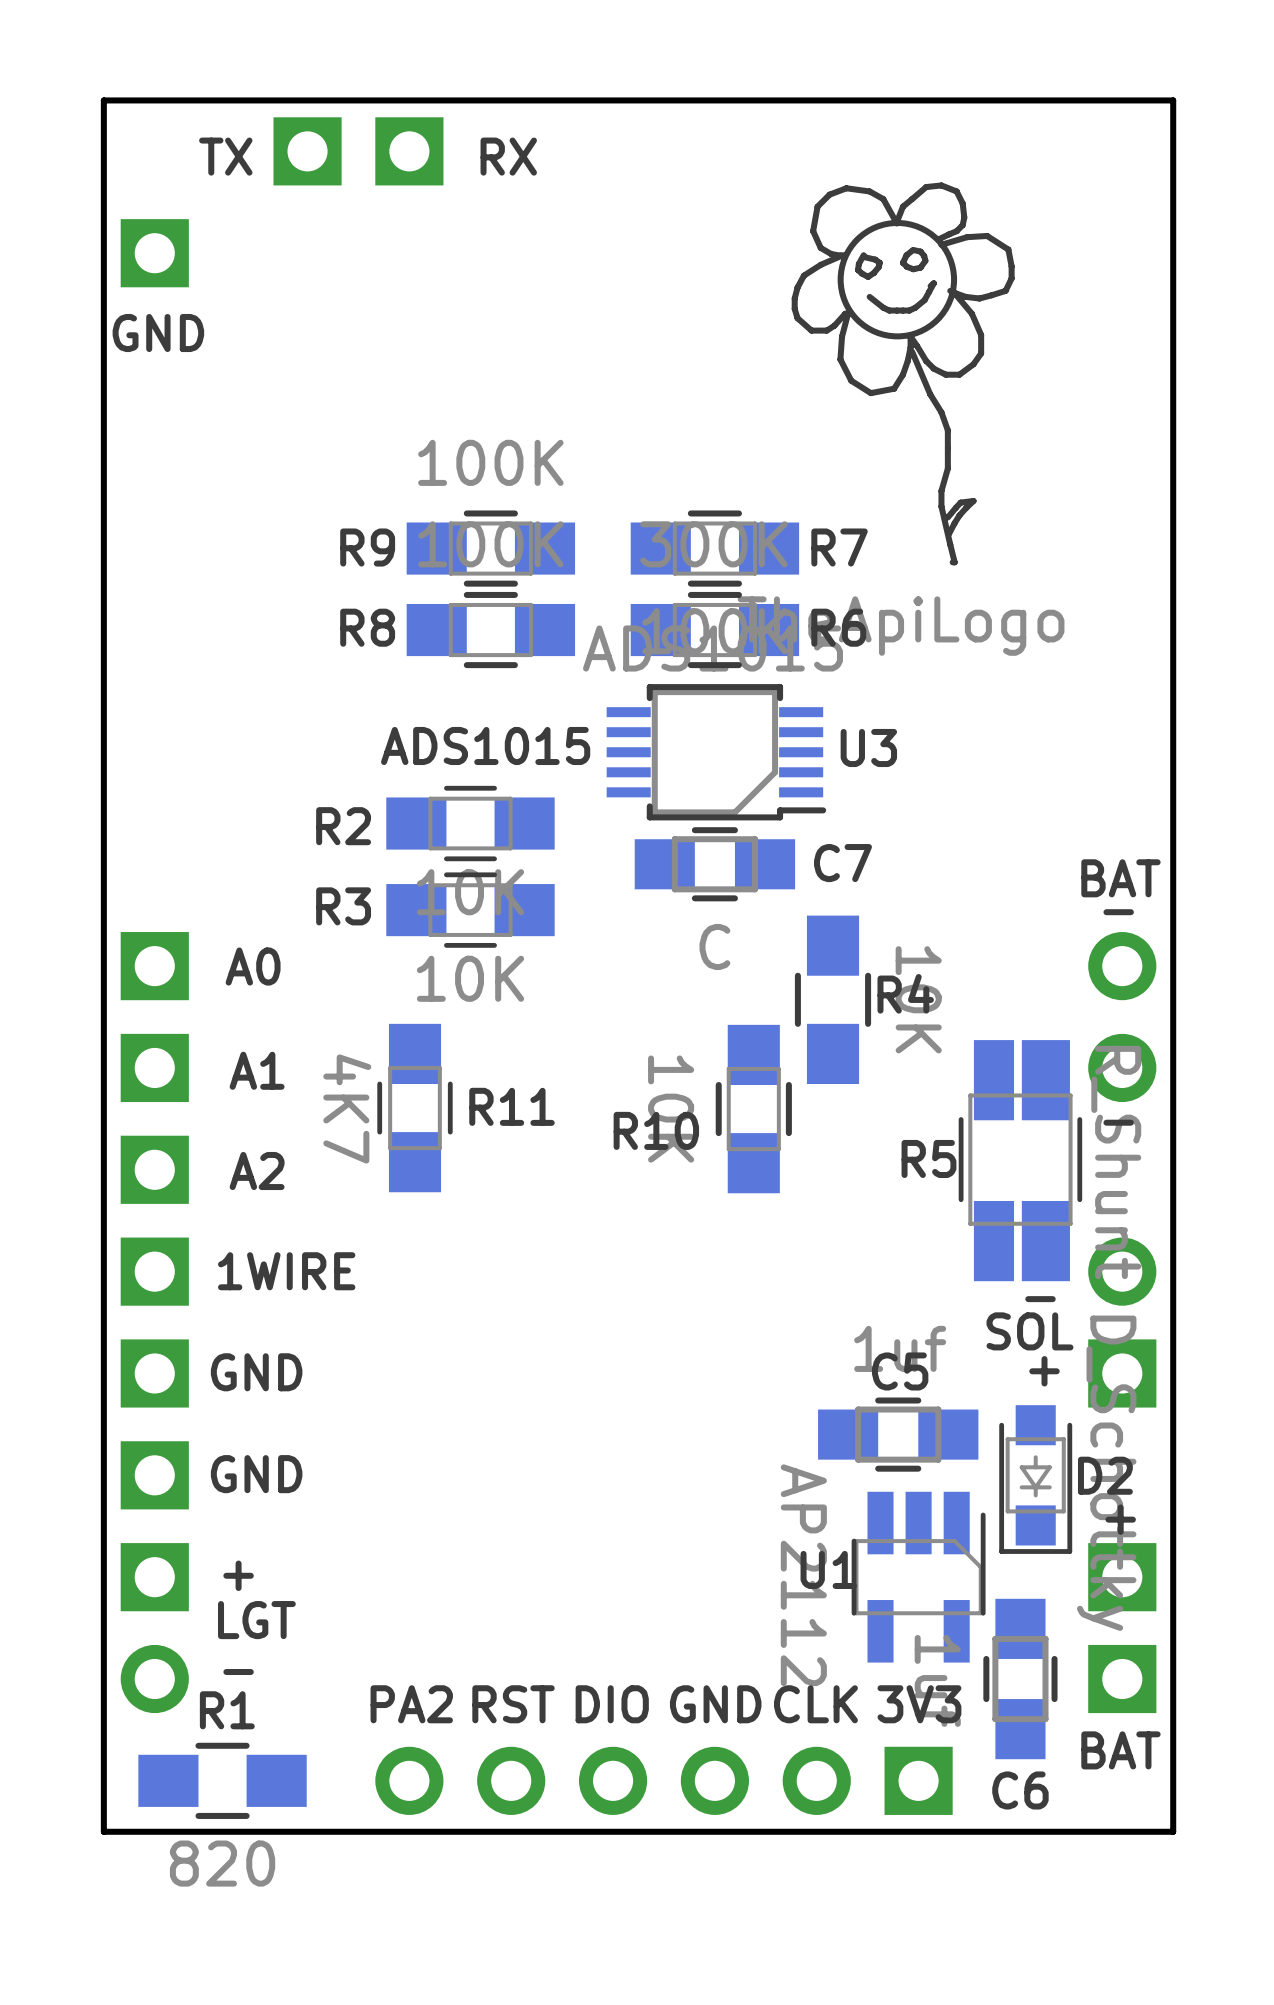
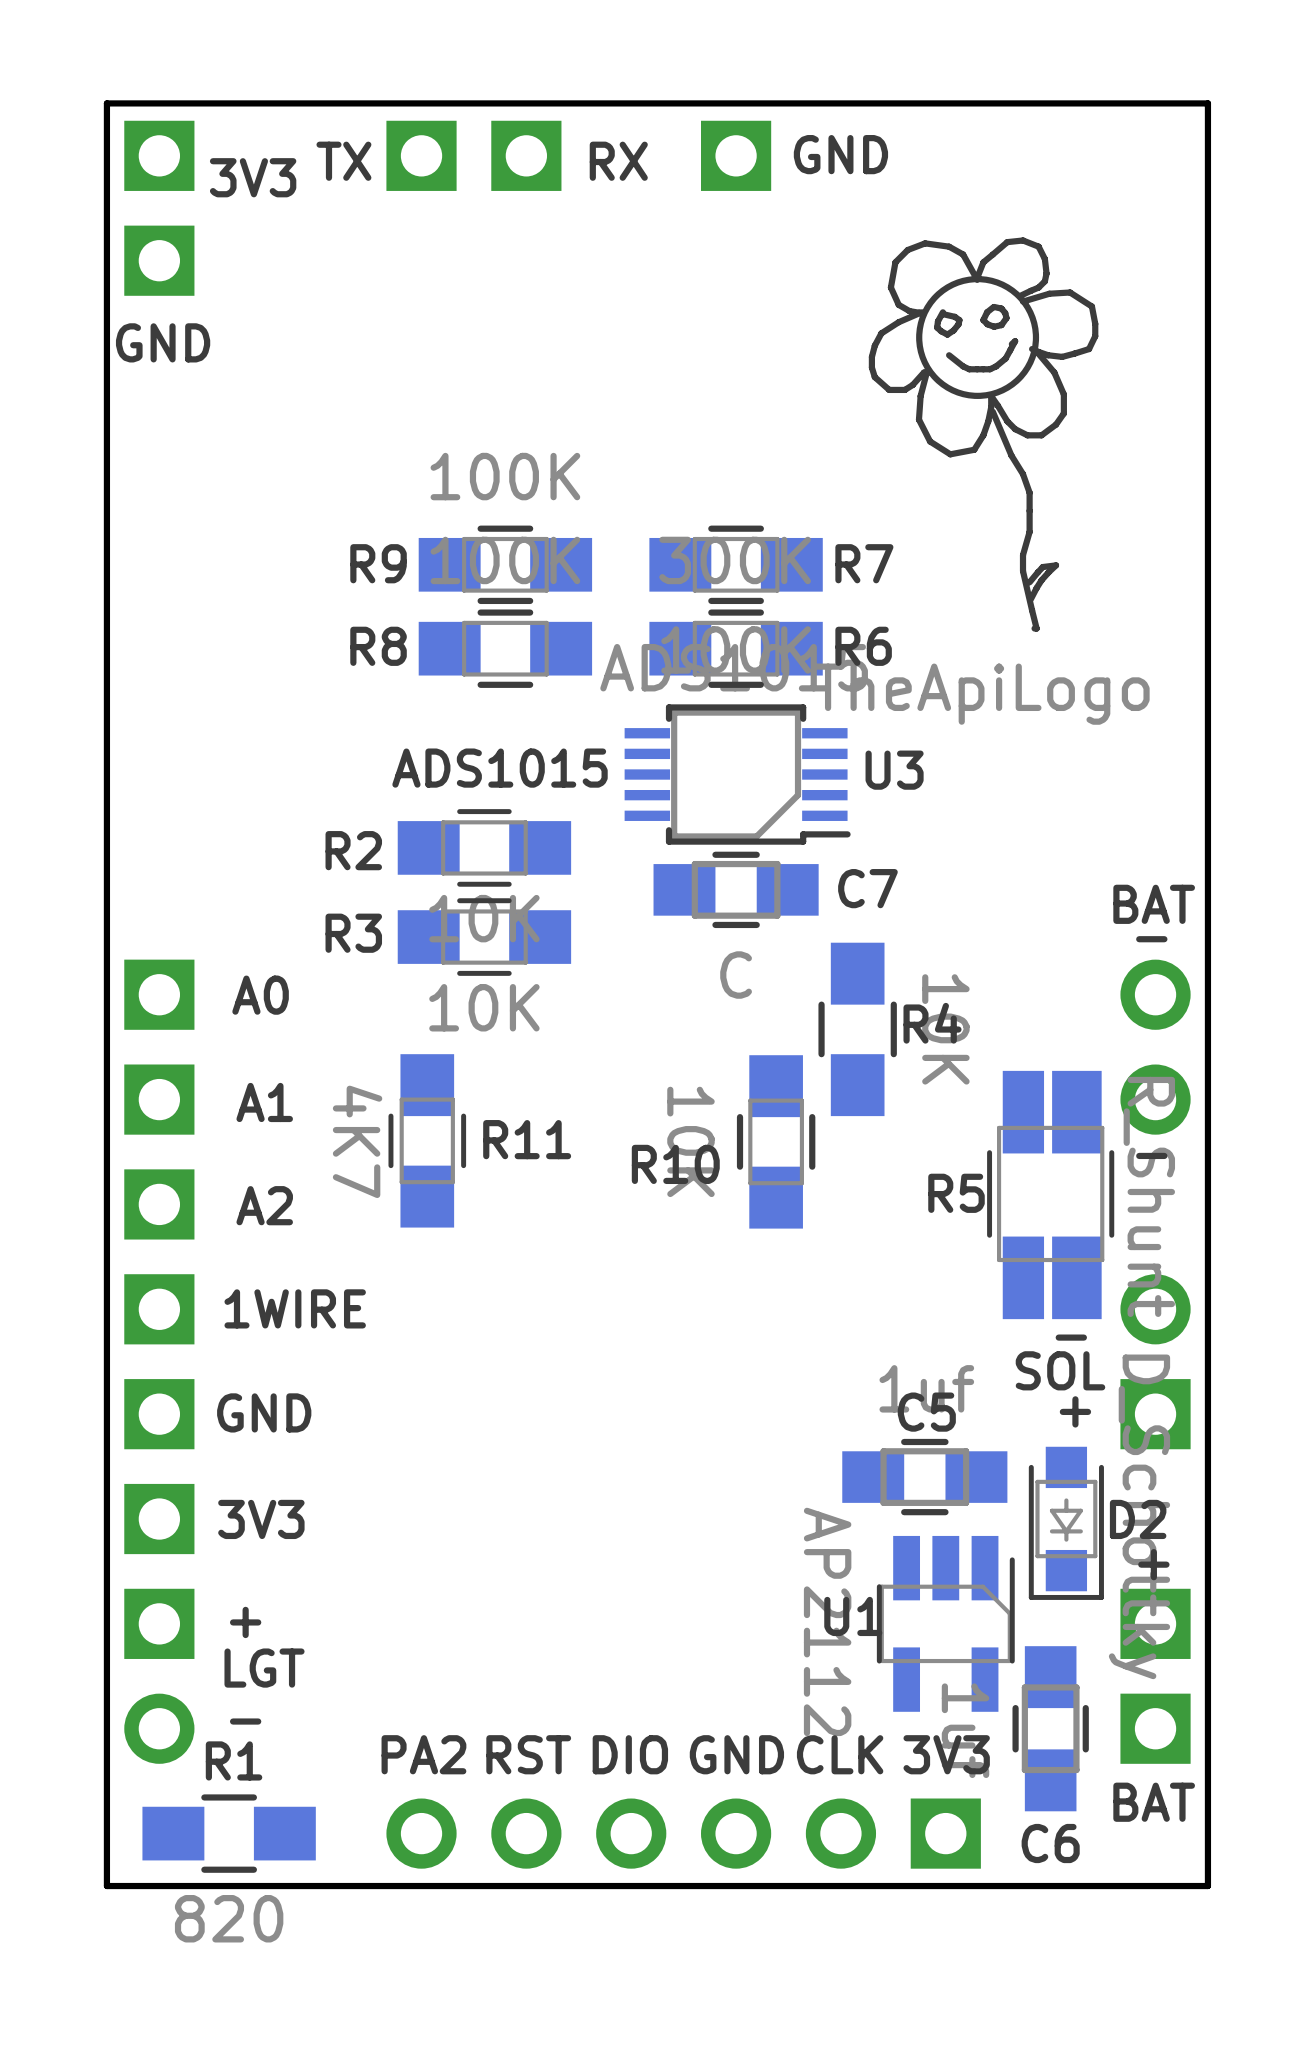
text: none -> GND (840, 154)
part: none -> (159, 155)
part: (307, 151) -> none
part: none -> (526, 155)
part: none -> (736, 155)
text: TX (225, 156) -> 3V3 (253, 177)
text: none -> TX (343, 161)
text position: RX (508, 156) -> RX (618, 161)
drawing position: (903, 373) -> (983, 434)
text: GND (256, 1474) -> 3V3 (261, 1519)

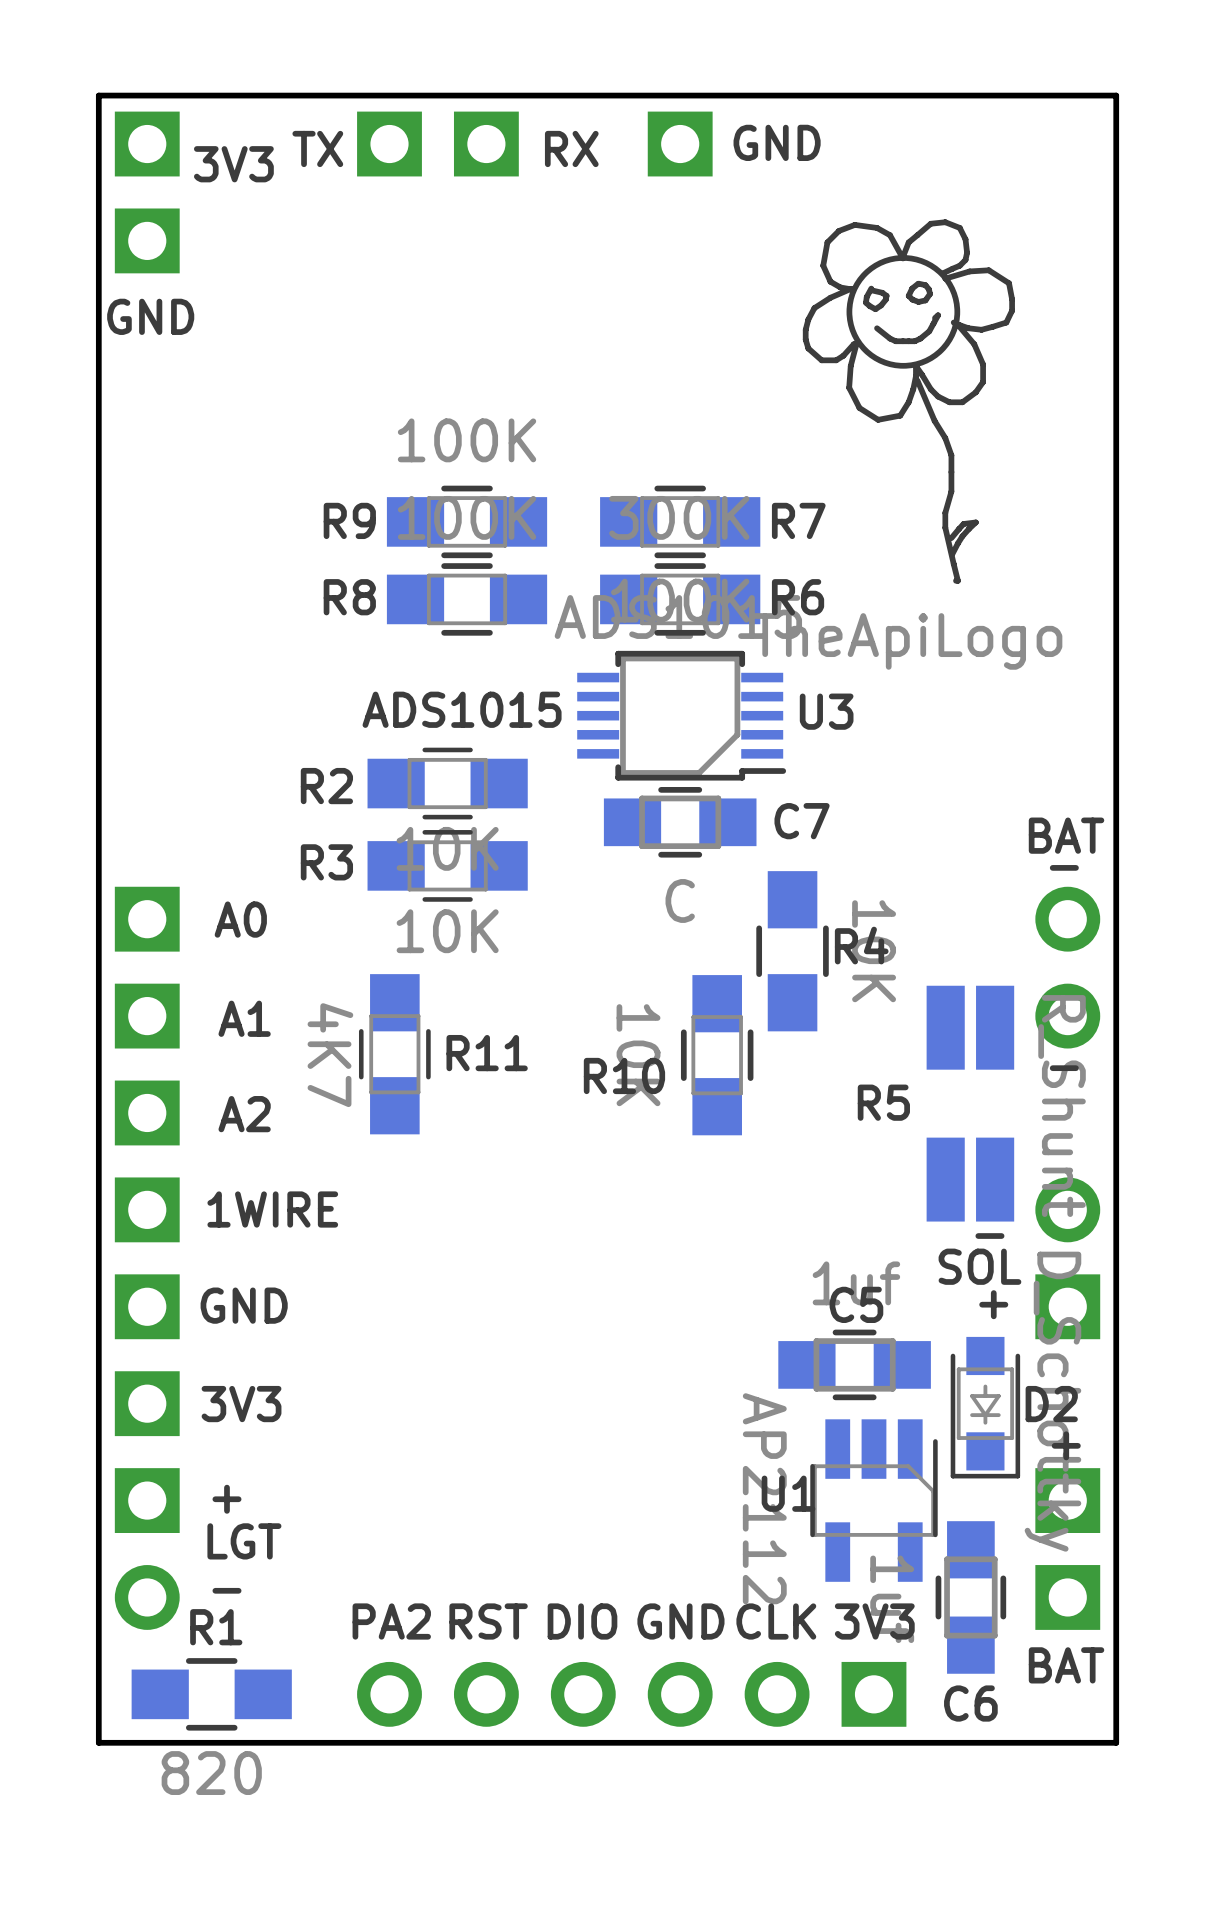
R5 footprint: [987, 1070, 1115, 1320] -> [926, 985, 1015, 1222]

